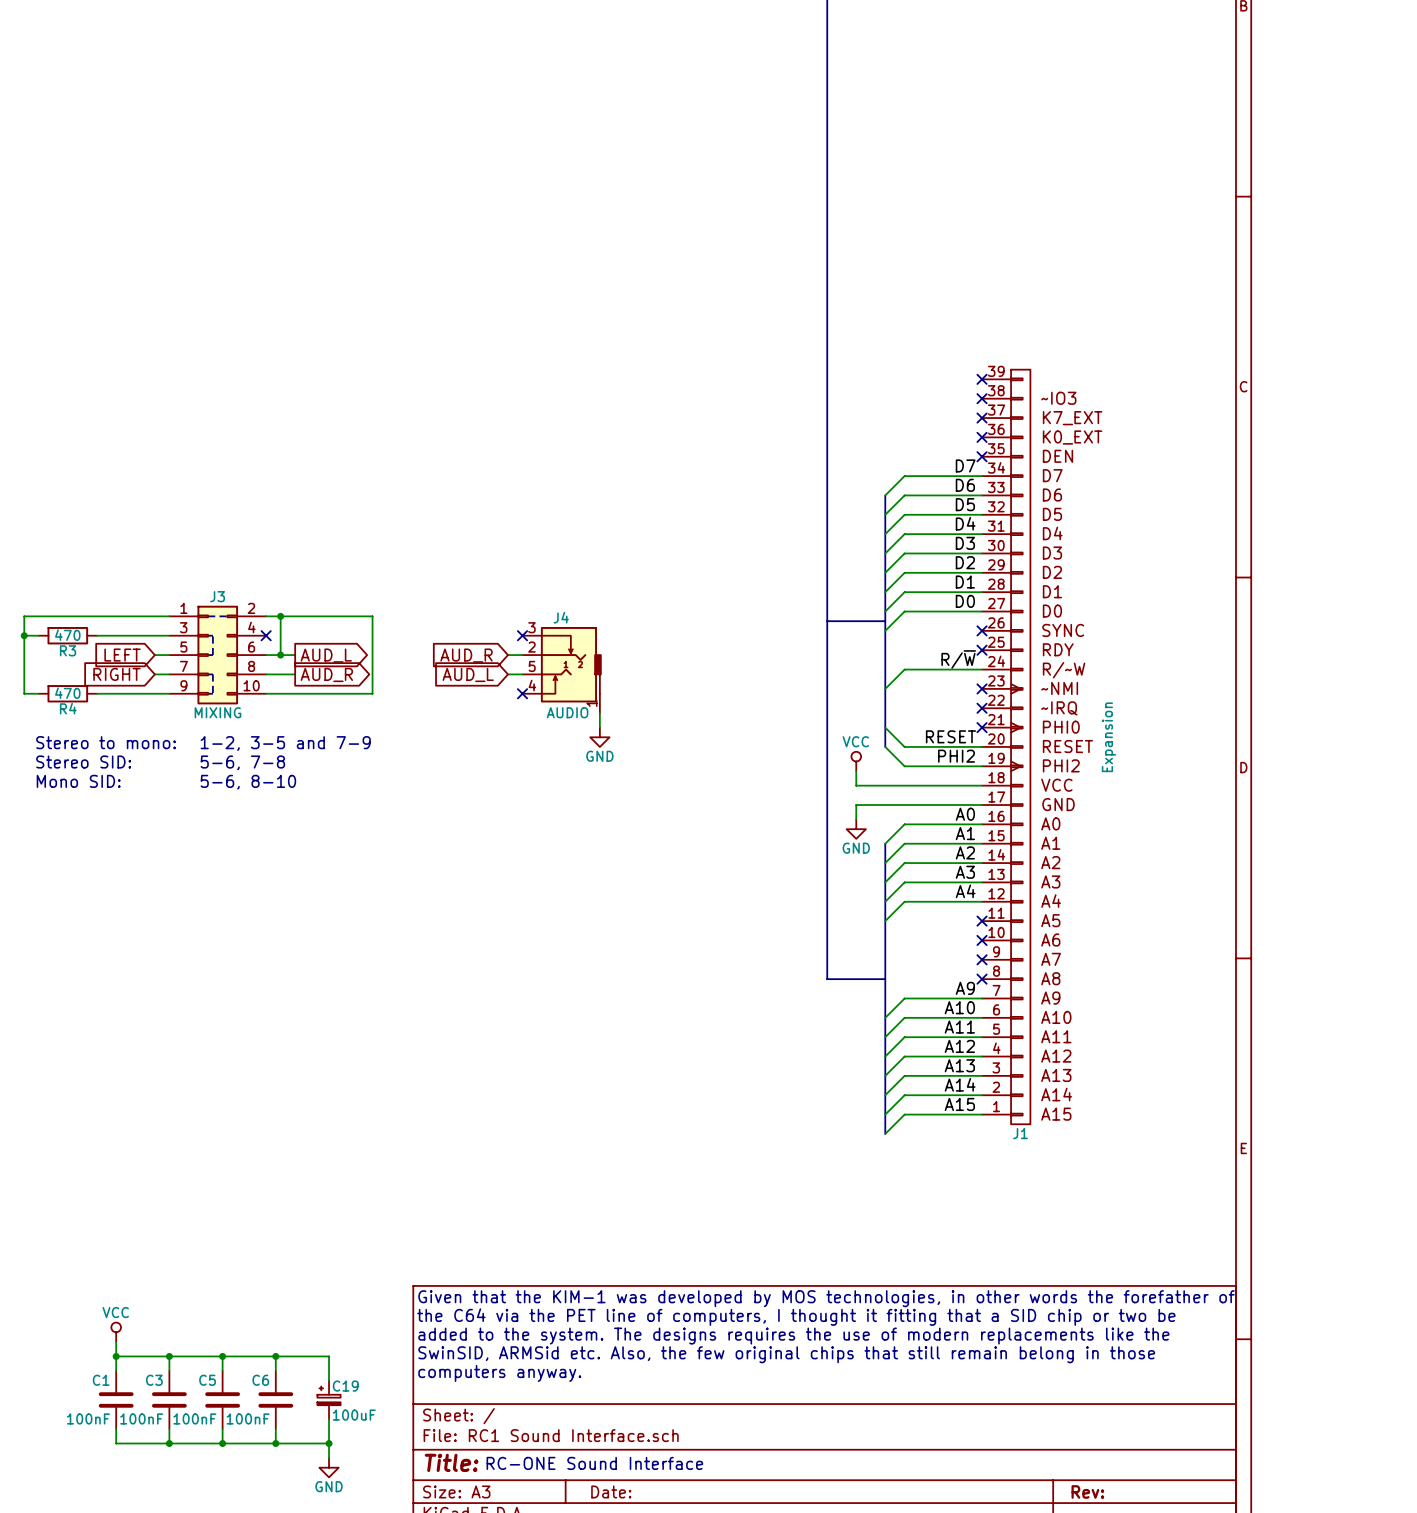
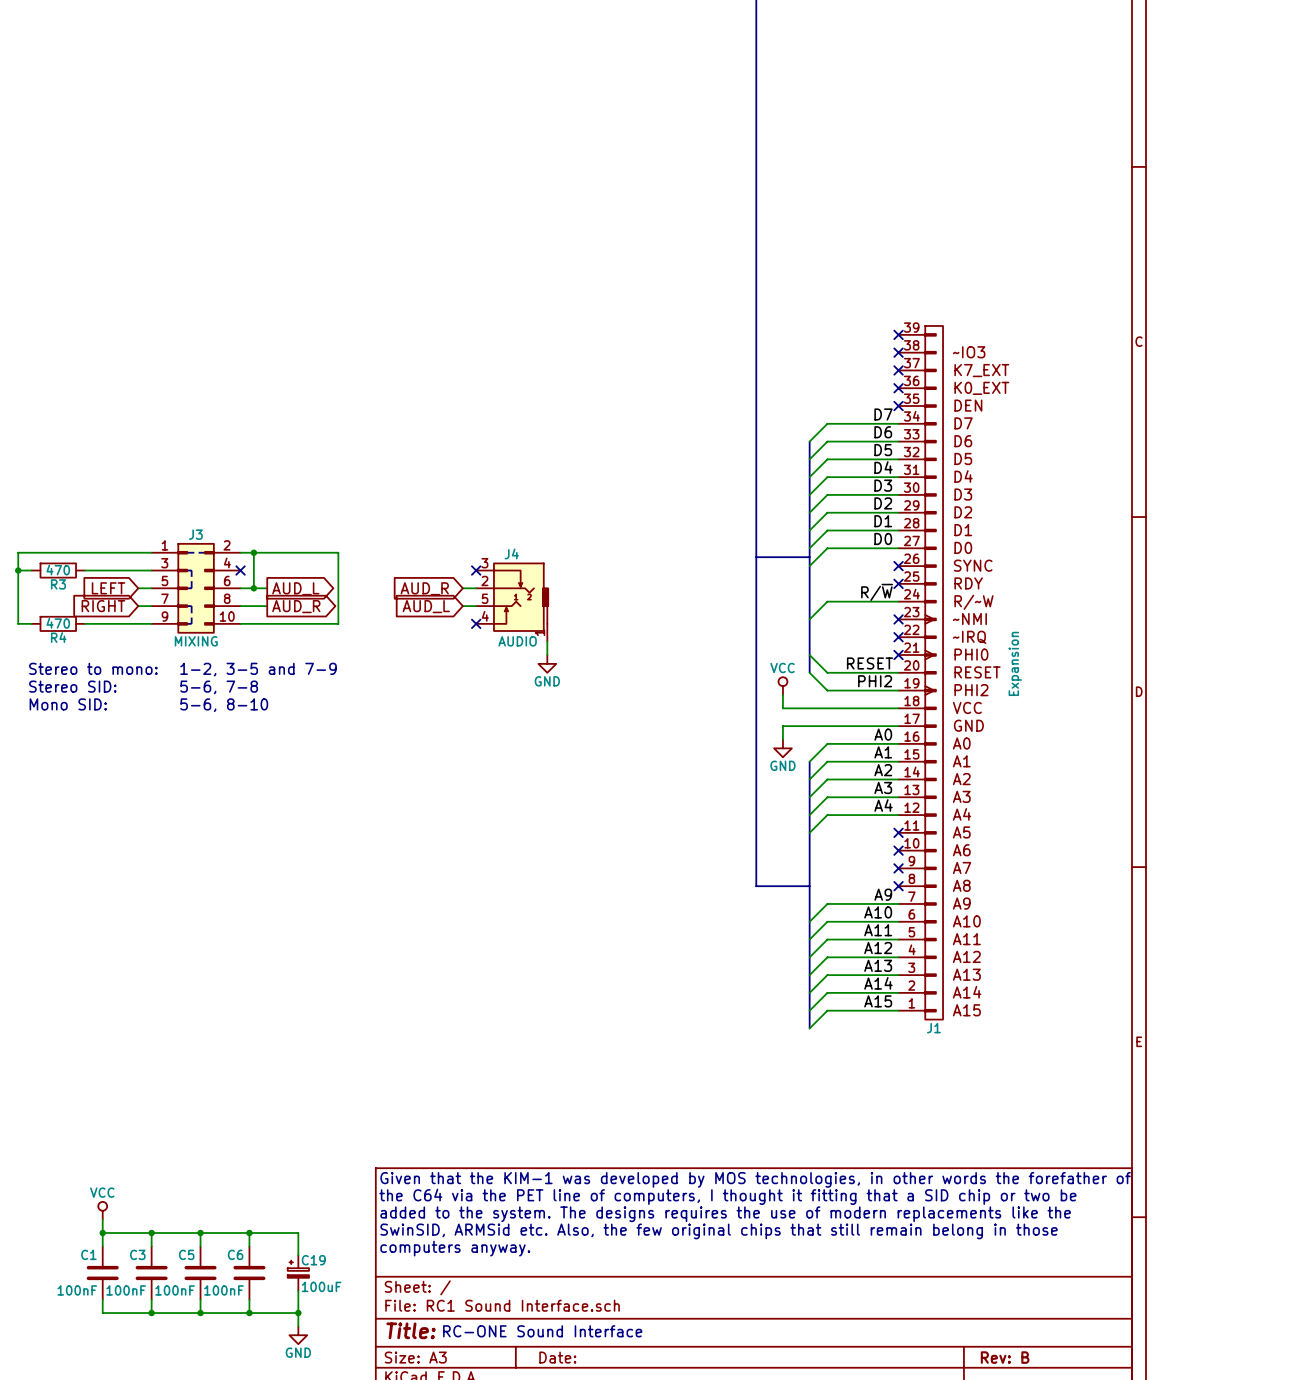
title block: Rev: (1087, 1491) -> Rev: B (1005, 1357)

